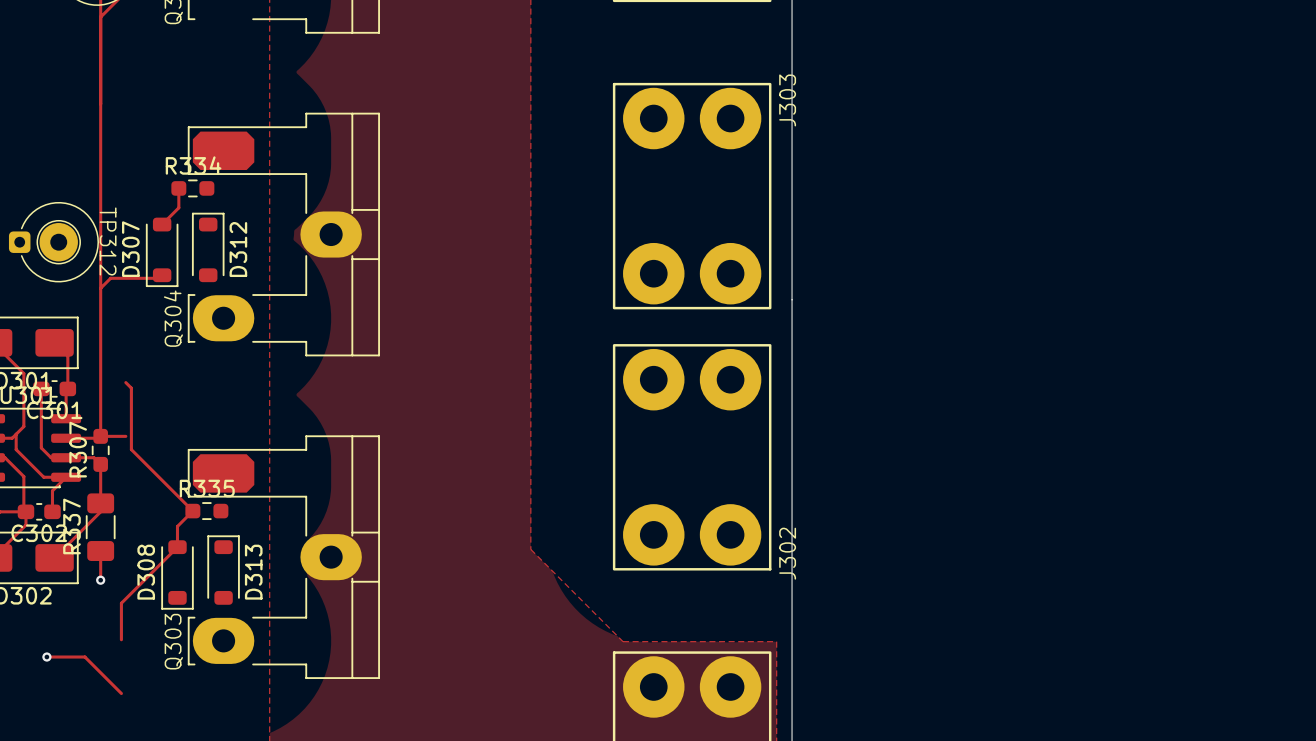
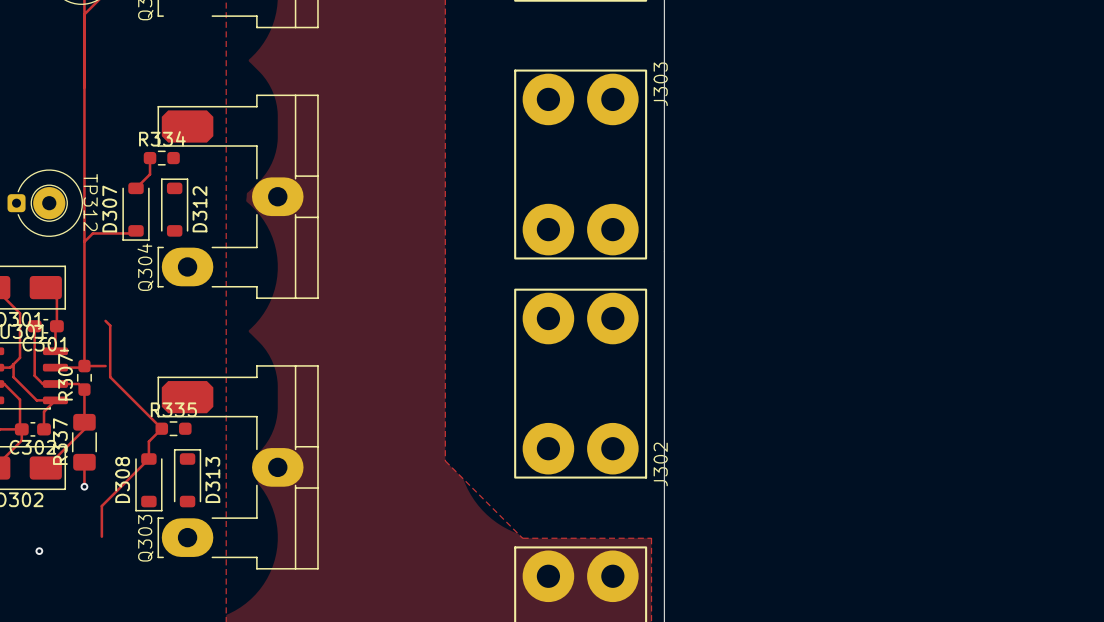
track: (46, 657) (84, 657) (121, 693) -> none

